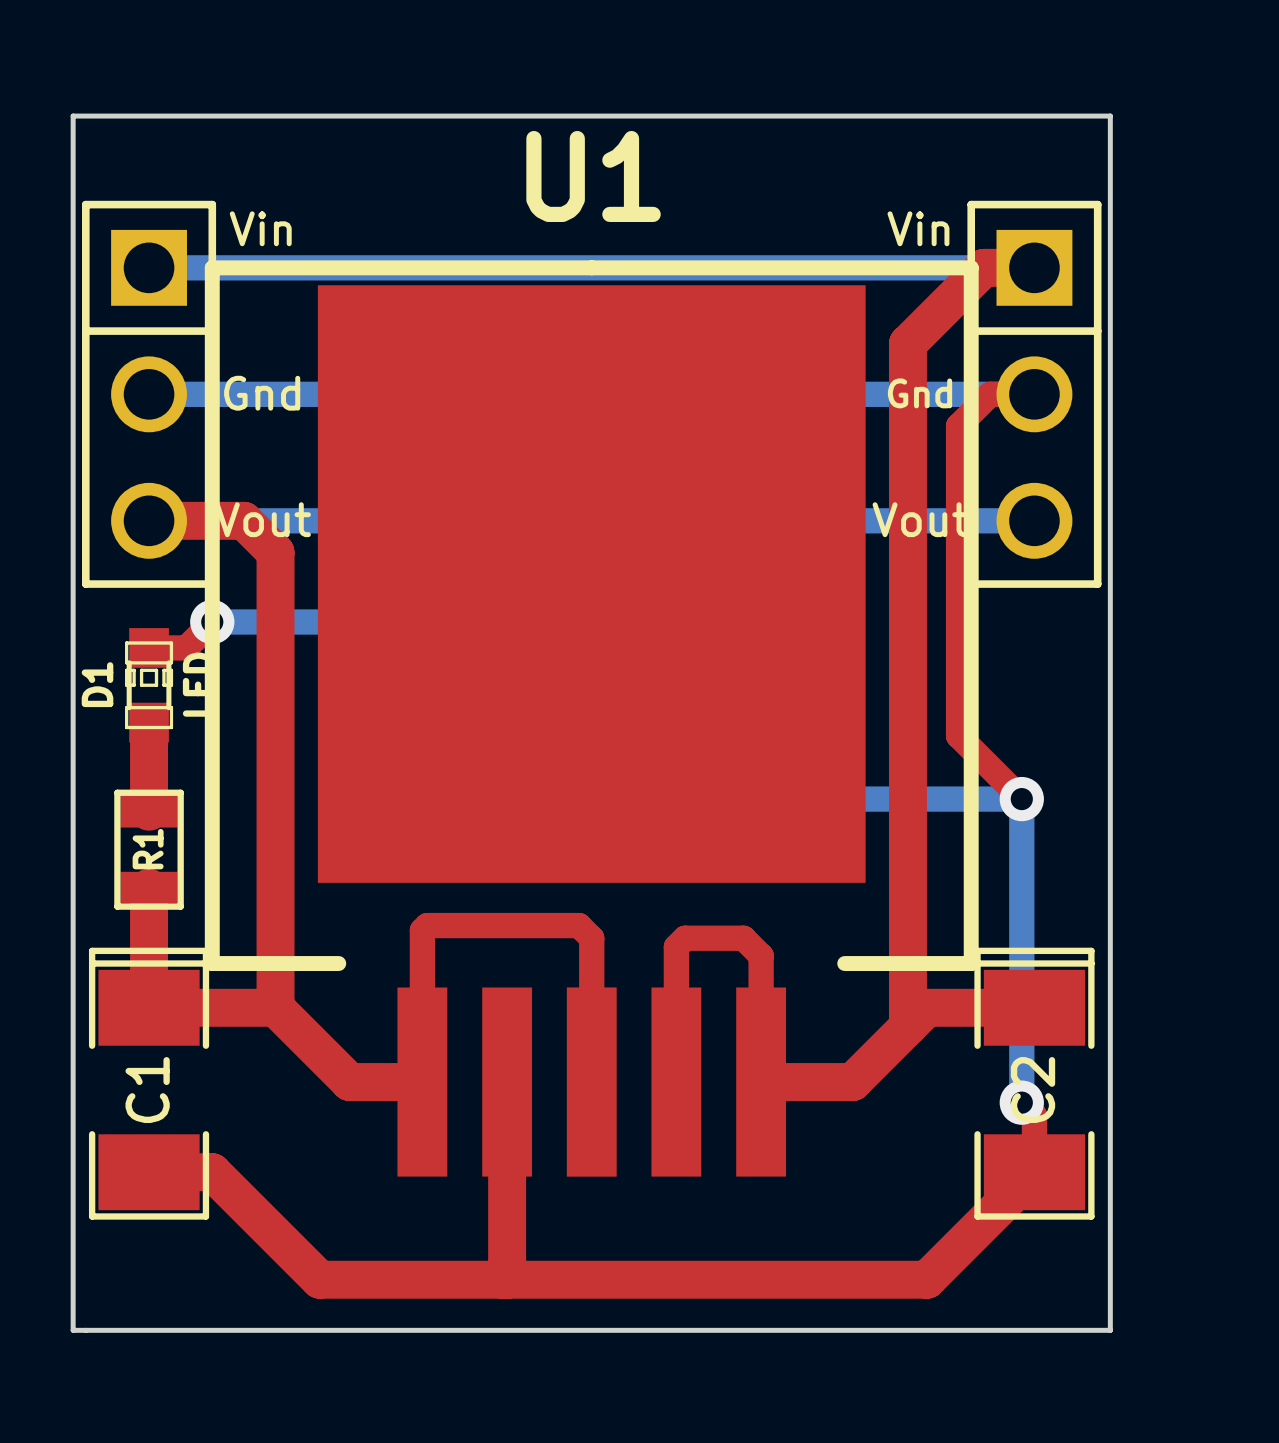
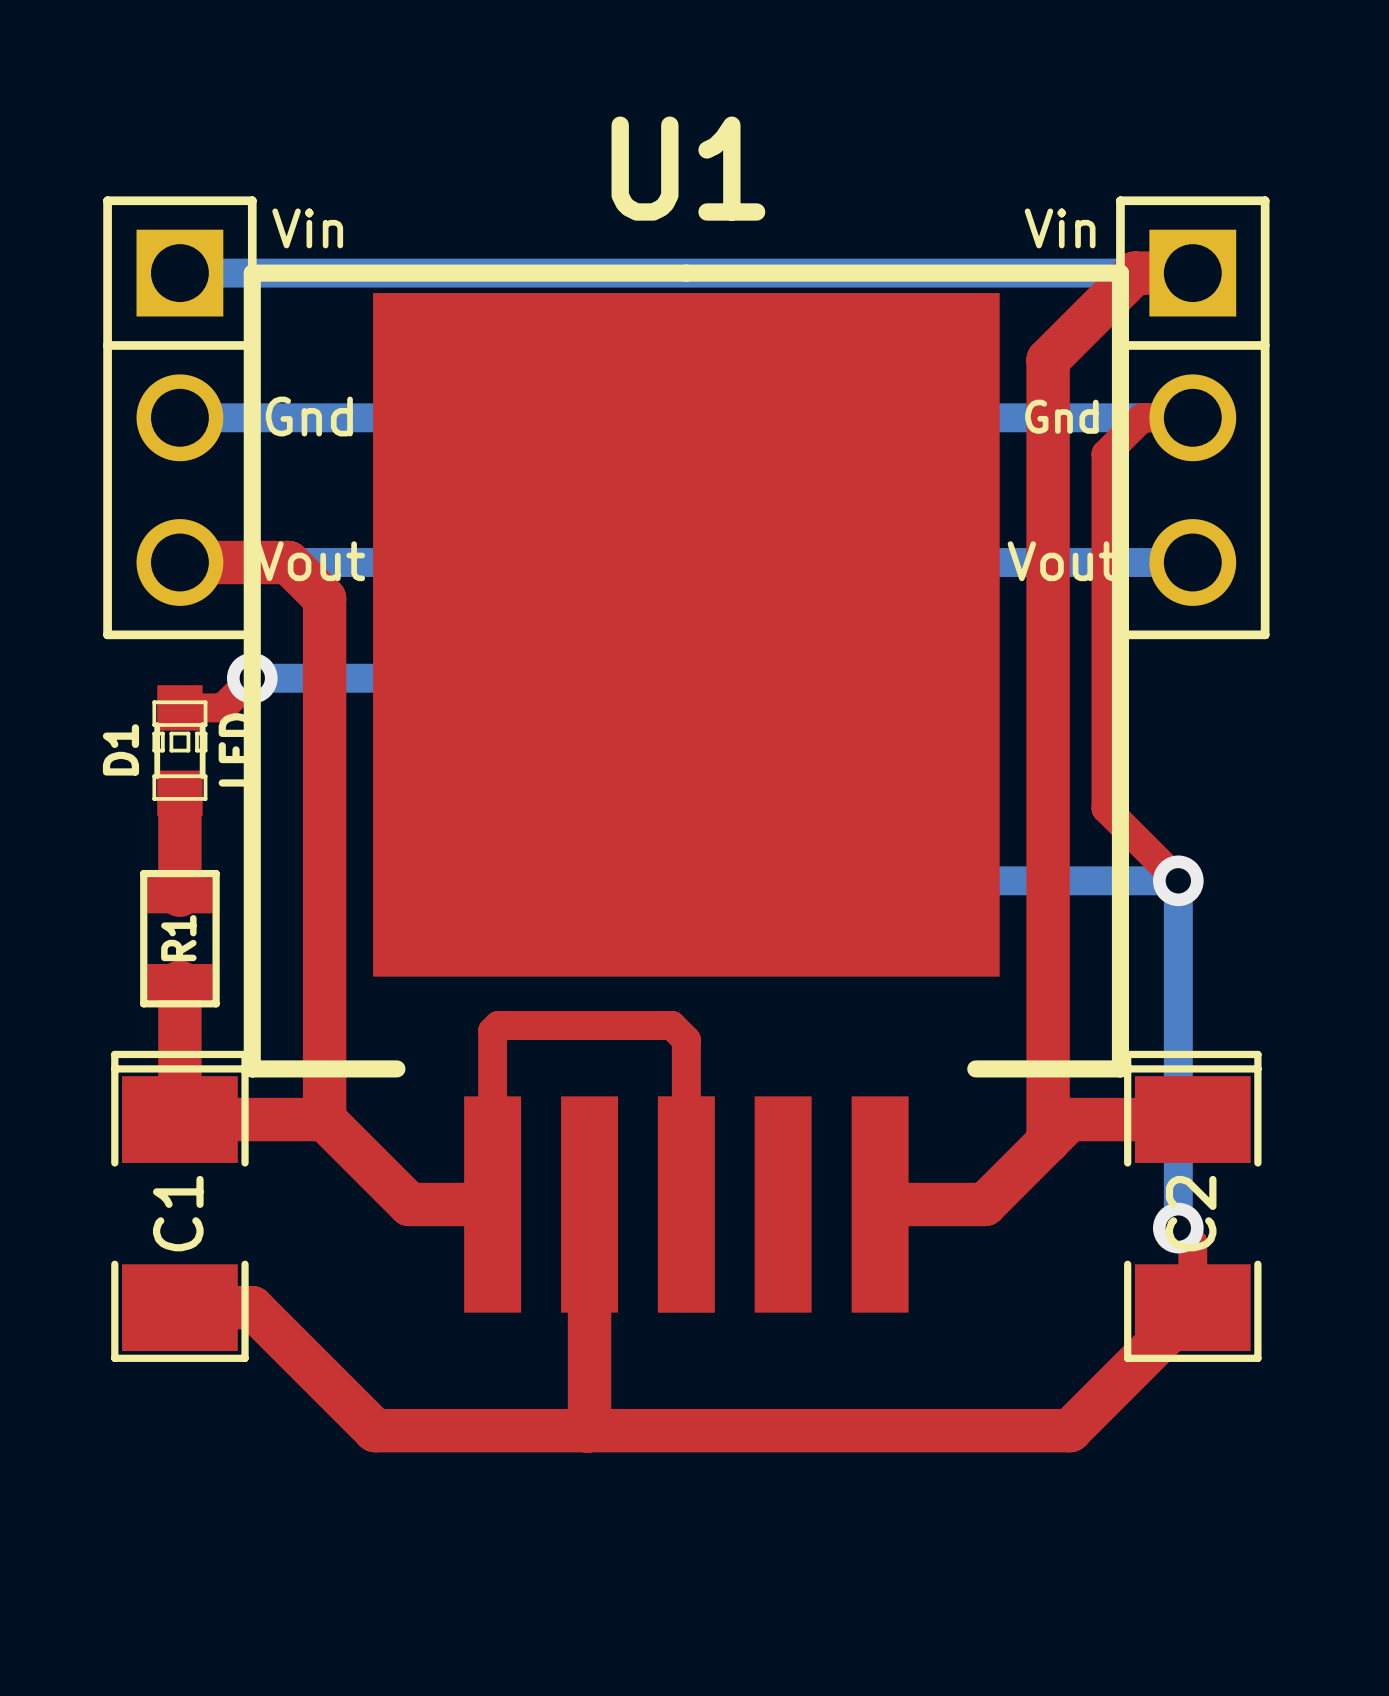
board edge: (73, 116) (73, 1330) (1110, 1330) (1110, 116) (73, 116) -> none
top track: (676, 1082) (676, 946) (685, 938) (743, 938) (761, 955) (761, 1082) -> none

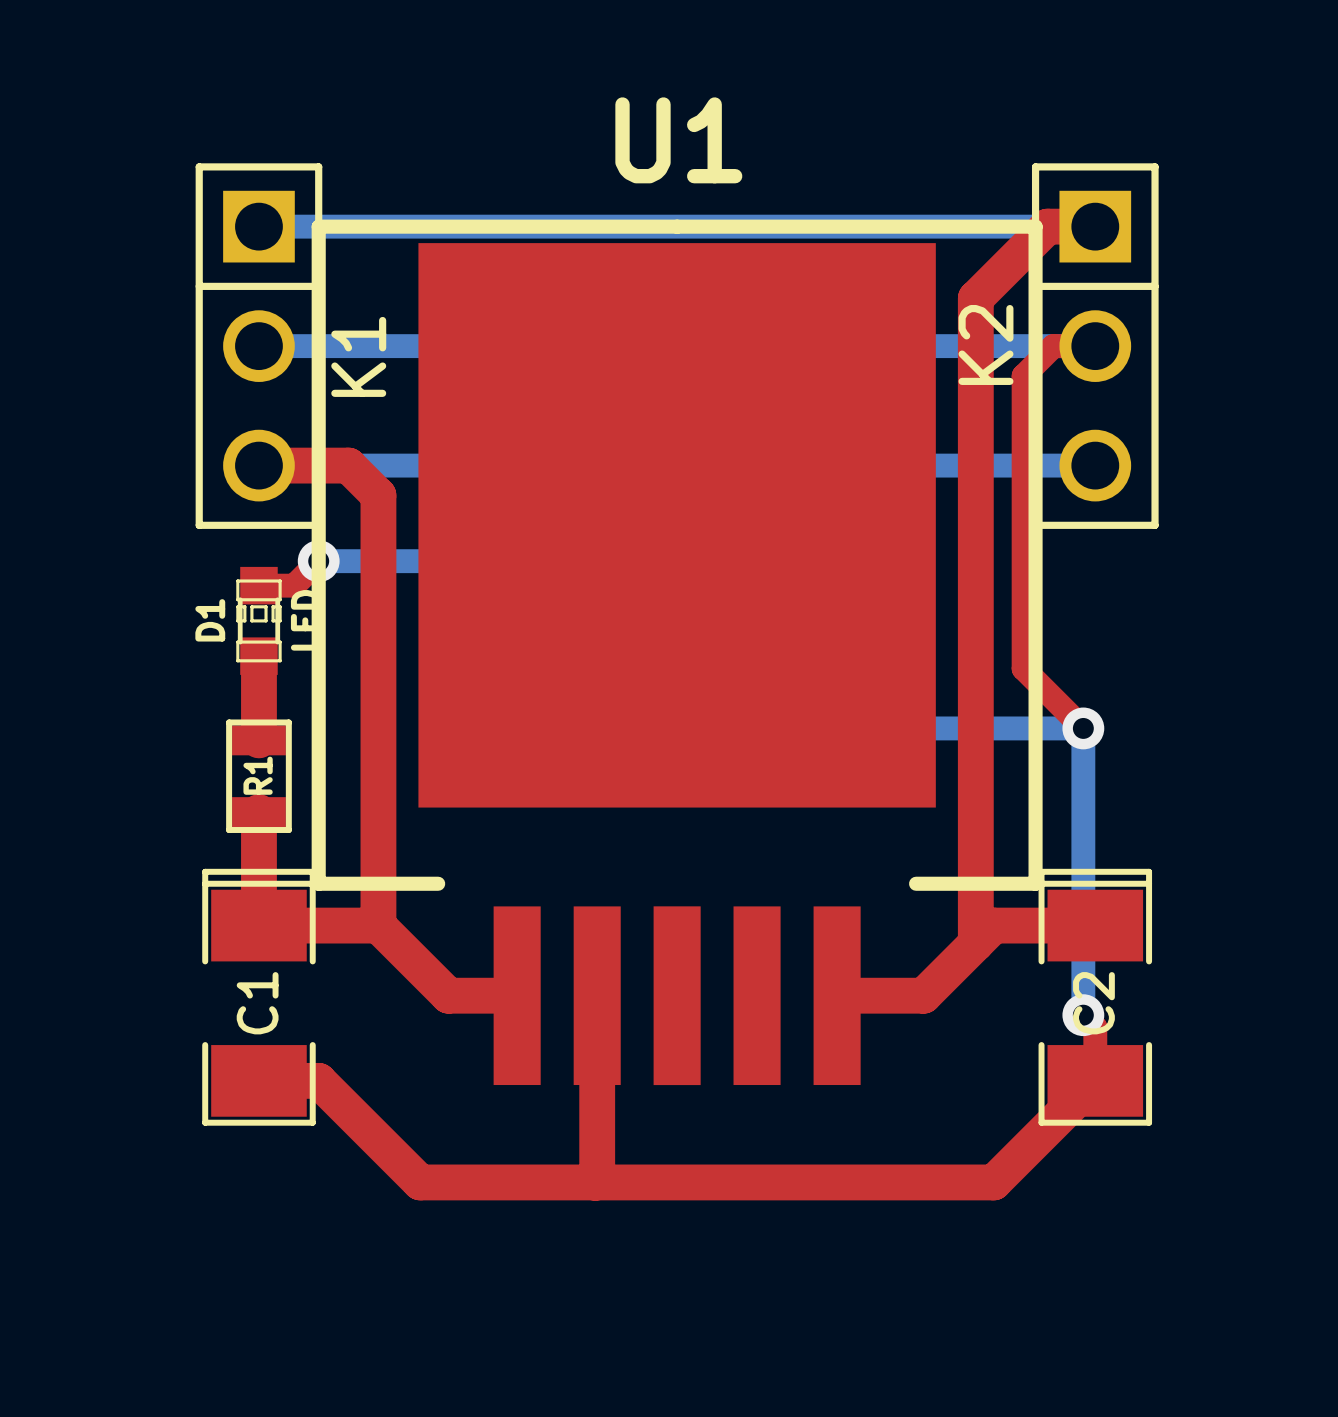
text: Vin (307, 228) -> none
text: Vin (1060, 228) -> none
text: Gnd (309, 416) -> none
K2 name: none -> K2 (985, 344)
text: Gnd (1061, 416) -> none
K1 name: none -> K1 (358, 356)
text: Vout (310, 561) -> none
text: Vout (1062, 561) -> none
top track: (492, 1204) (492, 1031) (498, 1025) (671, 1025) (686, 1039) (686, 1204) -> none

